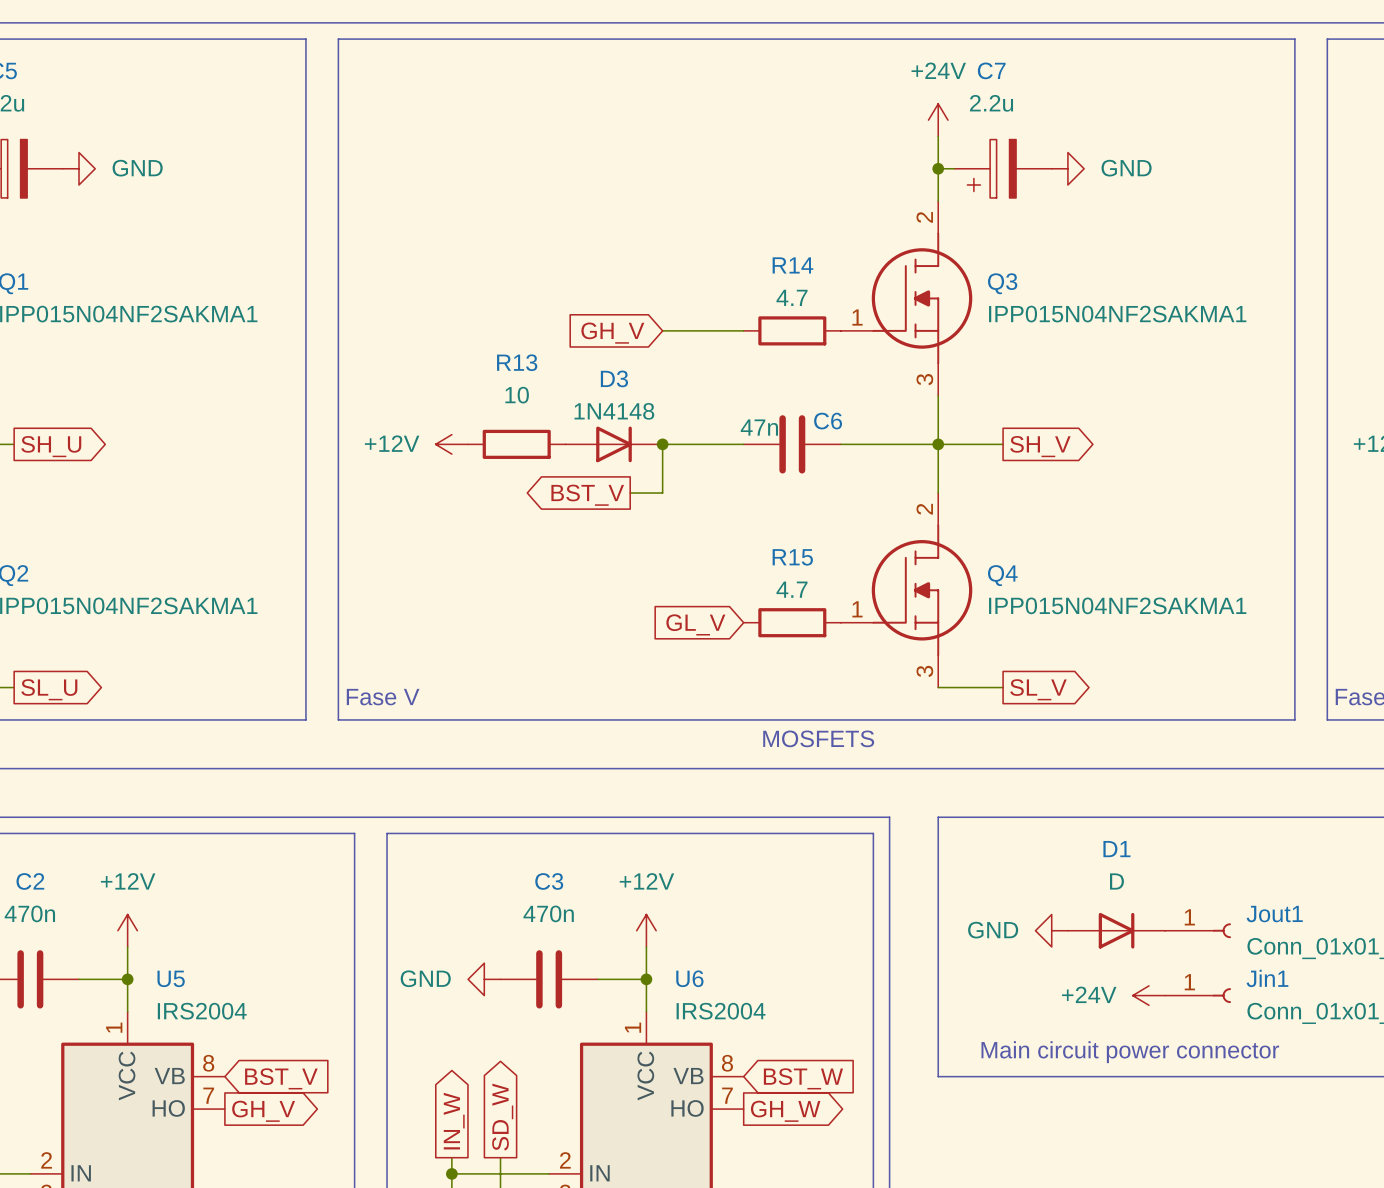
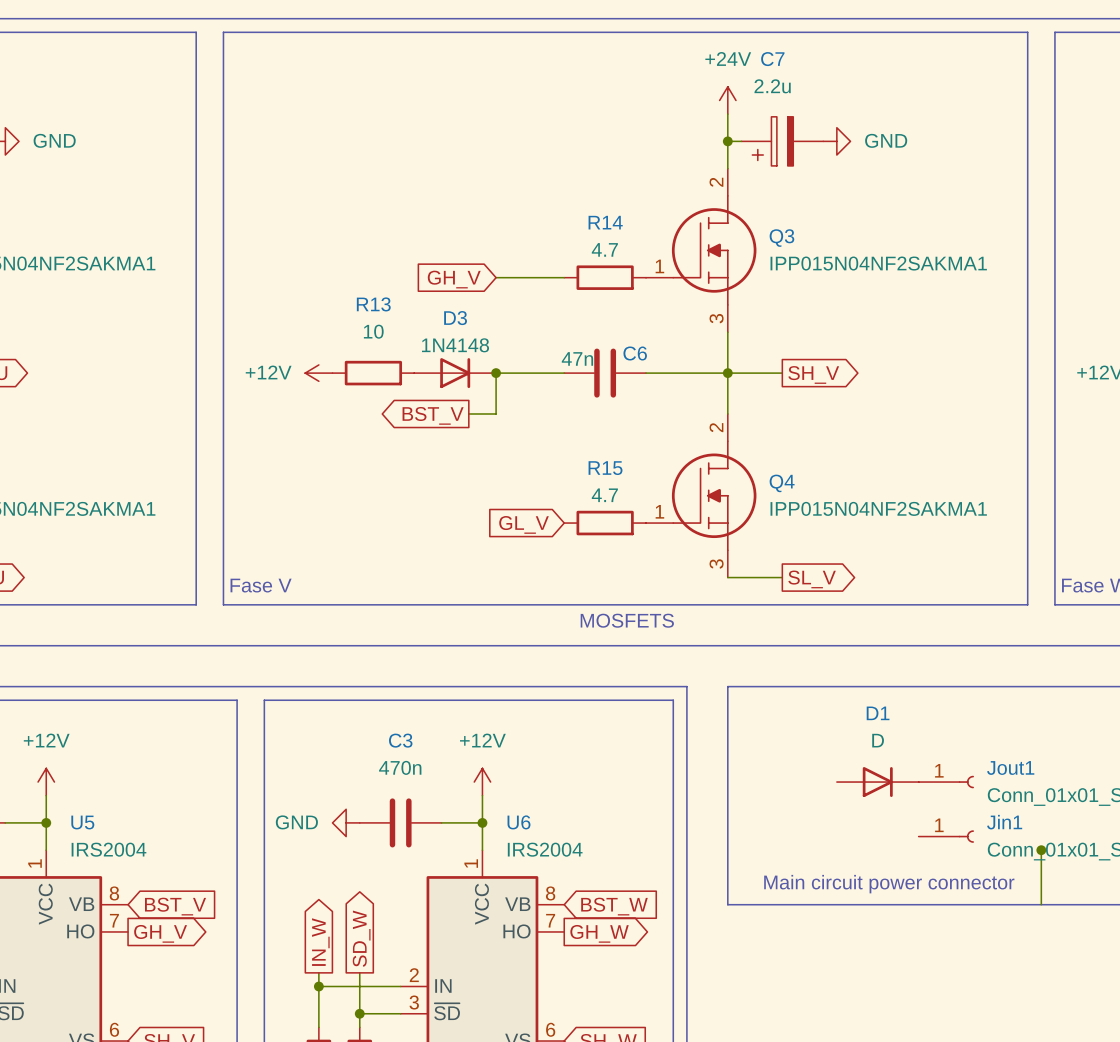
power symbol: GND (1051, 930) -> none
power symbol: +24V (1148, 995) -> none
wire: none -> (1041, 850) (1041, 904)
junction: none -> (1041, 850)

